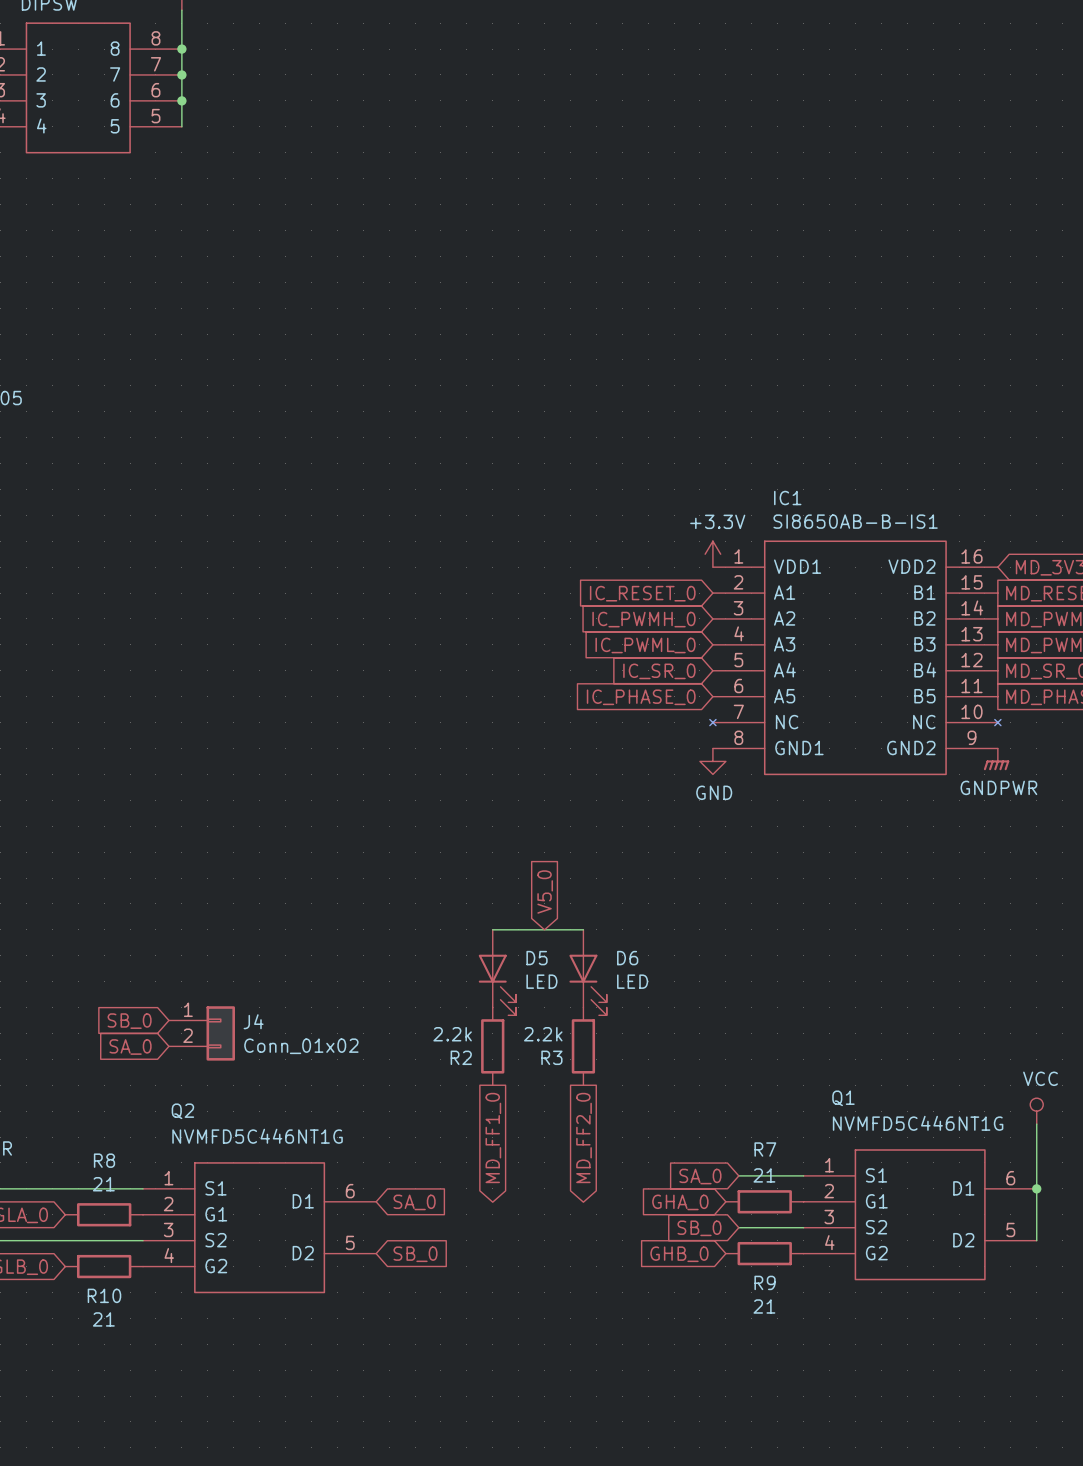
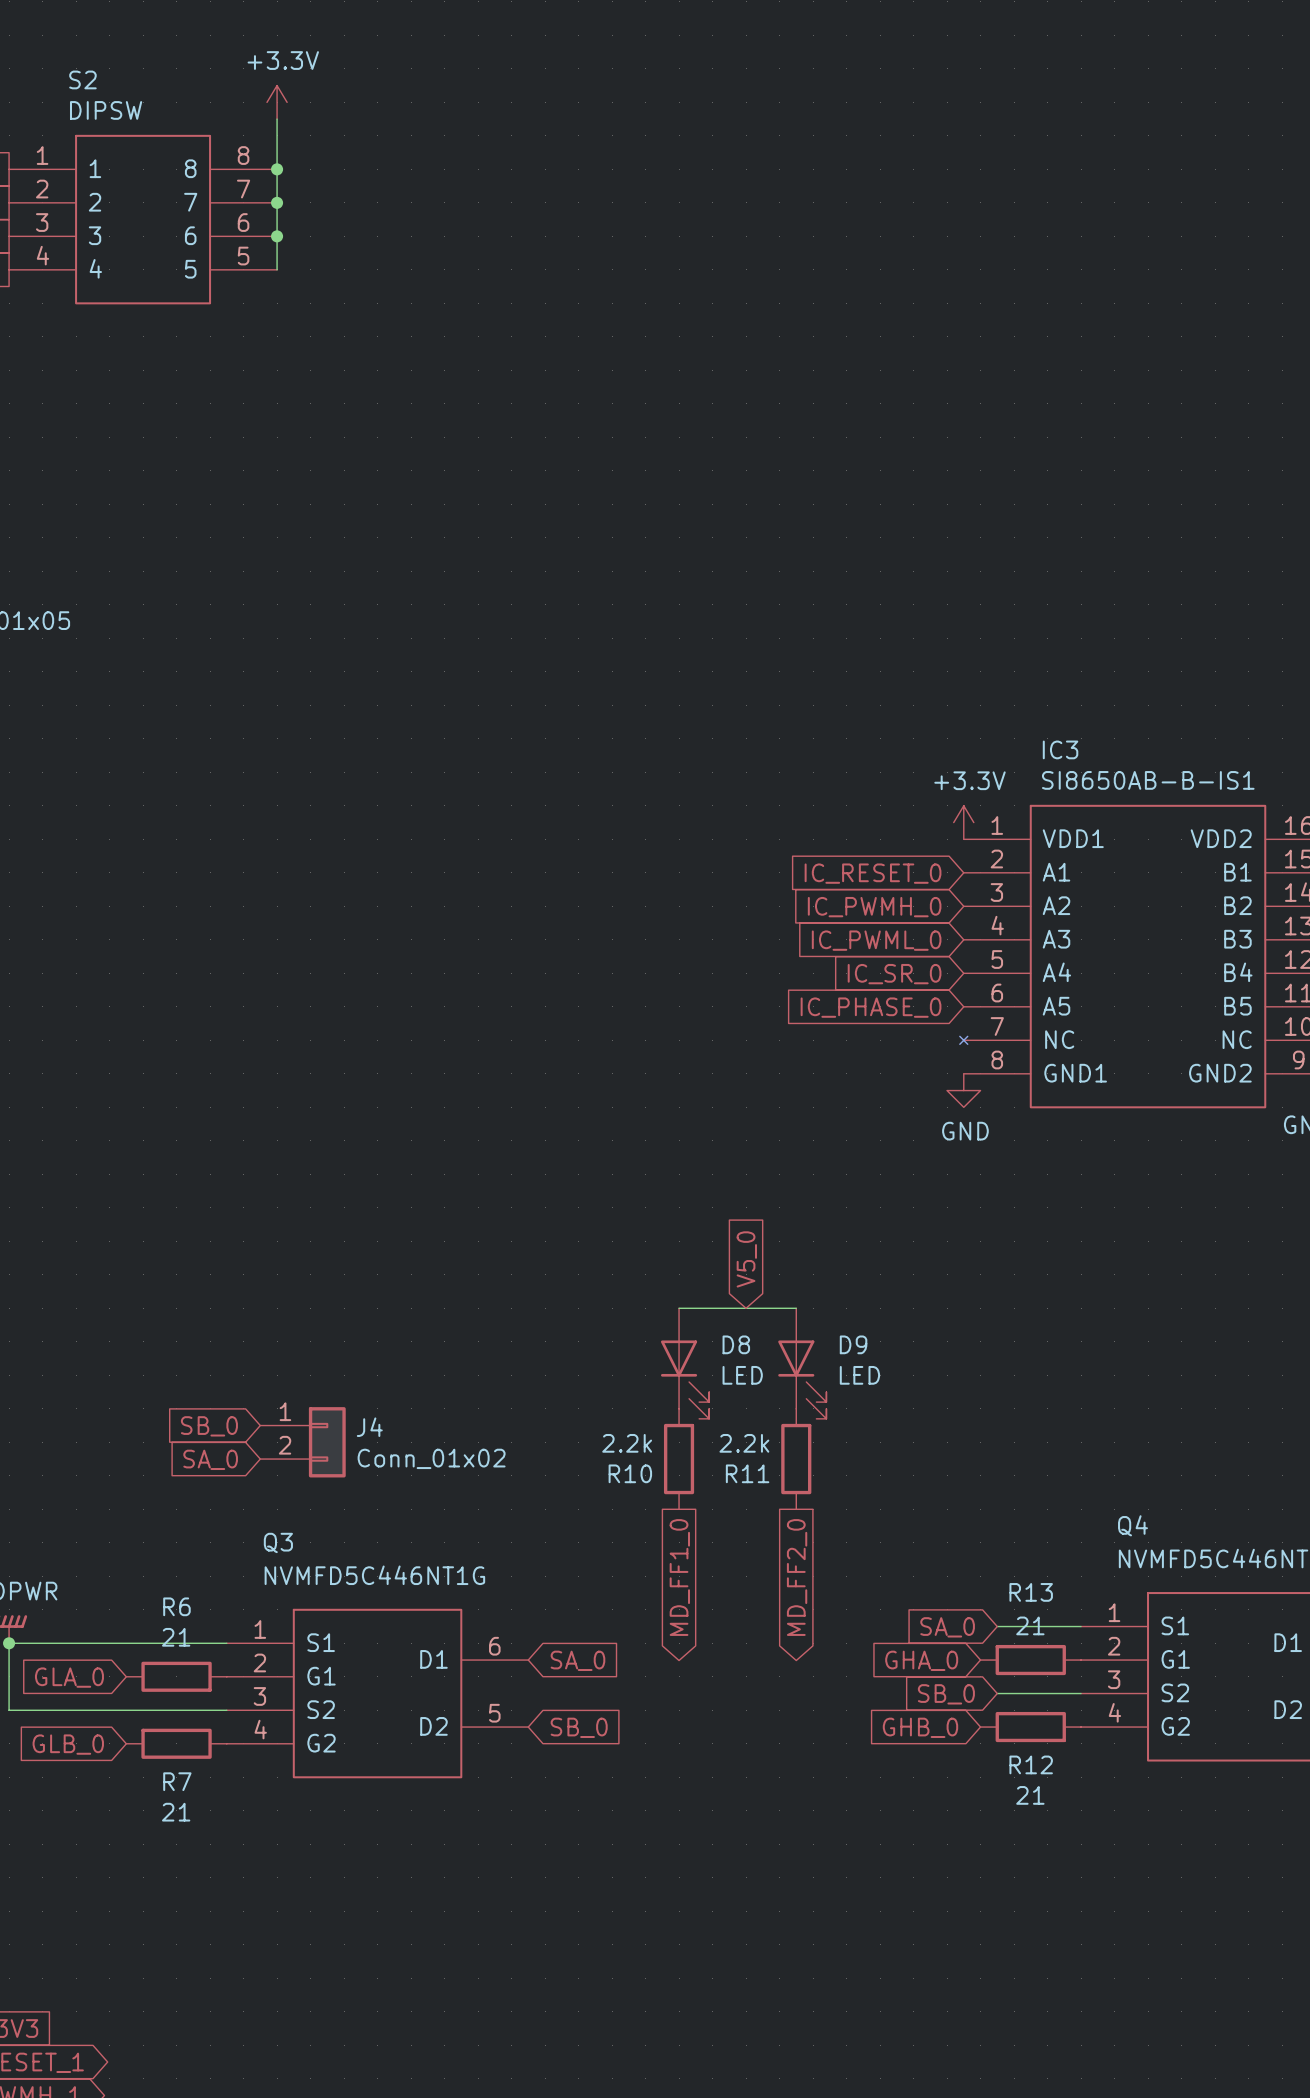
IC1 name: IC1 (787, 498) -> IC3 (1060, 749)
D5 name: D5 (537, 958) -> D8 (736, 1344)
D6 name: D6 (627, 958) -> D9 (853, 1344)
R2 name: R2 (461, 1057) -> R10 (630, 1473)
R3 name: R3 (551, 1057) -> R11 (747, 1473)
Q1 name: Q1 (843, 1098) -> Q4 (1132, 1525)
Q2 name: Q2 (182, 1111) -> Q3 (278, 1542)
R7 name: R7 (765, 1149) -> R13 (1031, 1592)
R8 name: R8 (104, 1160) -> R6 (176, 1606)
R9 name: R9 (765, 1282) -> R12 (1031, 1764)
R10 name: R10 (104, 1295) -> R7 (177, 1781)

